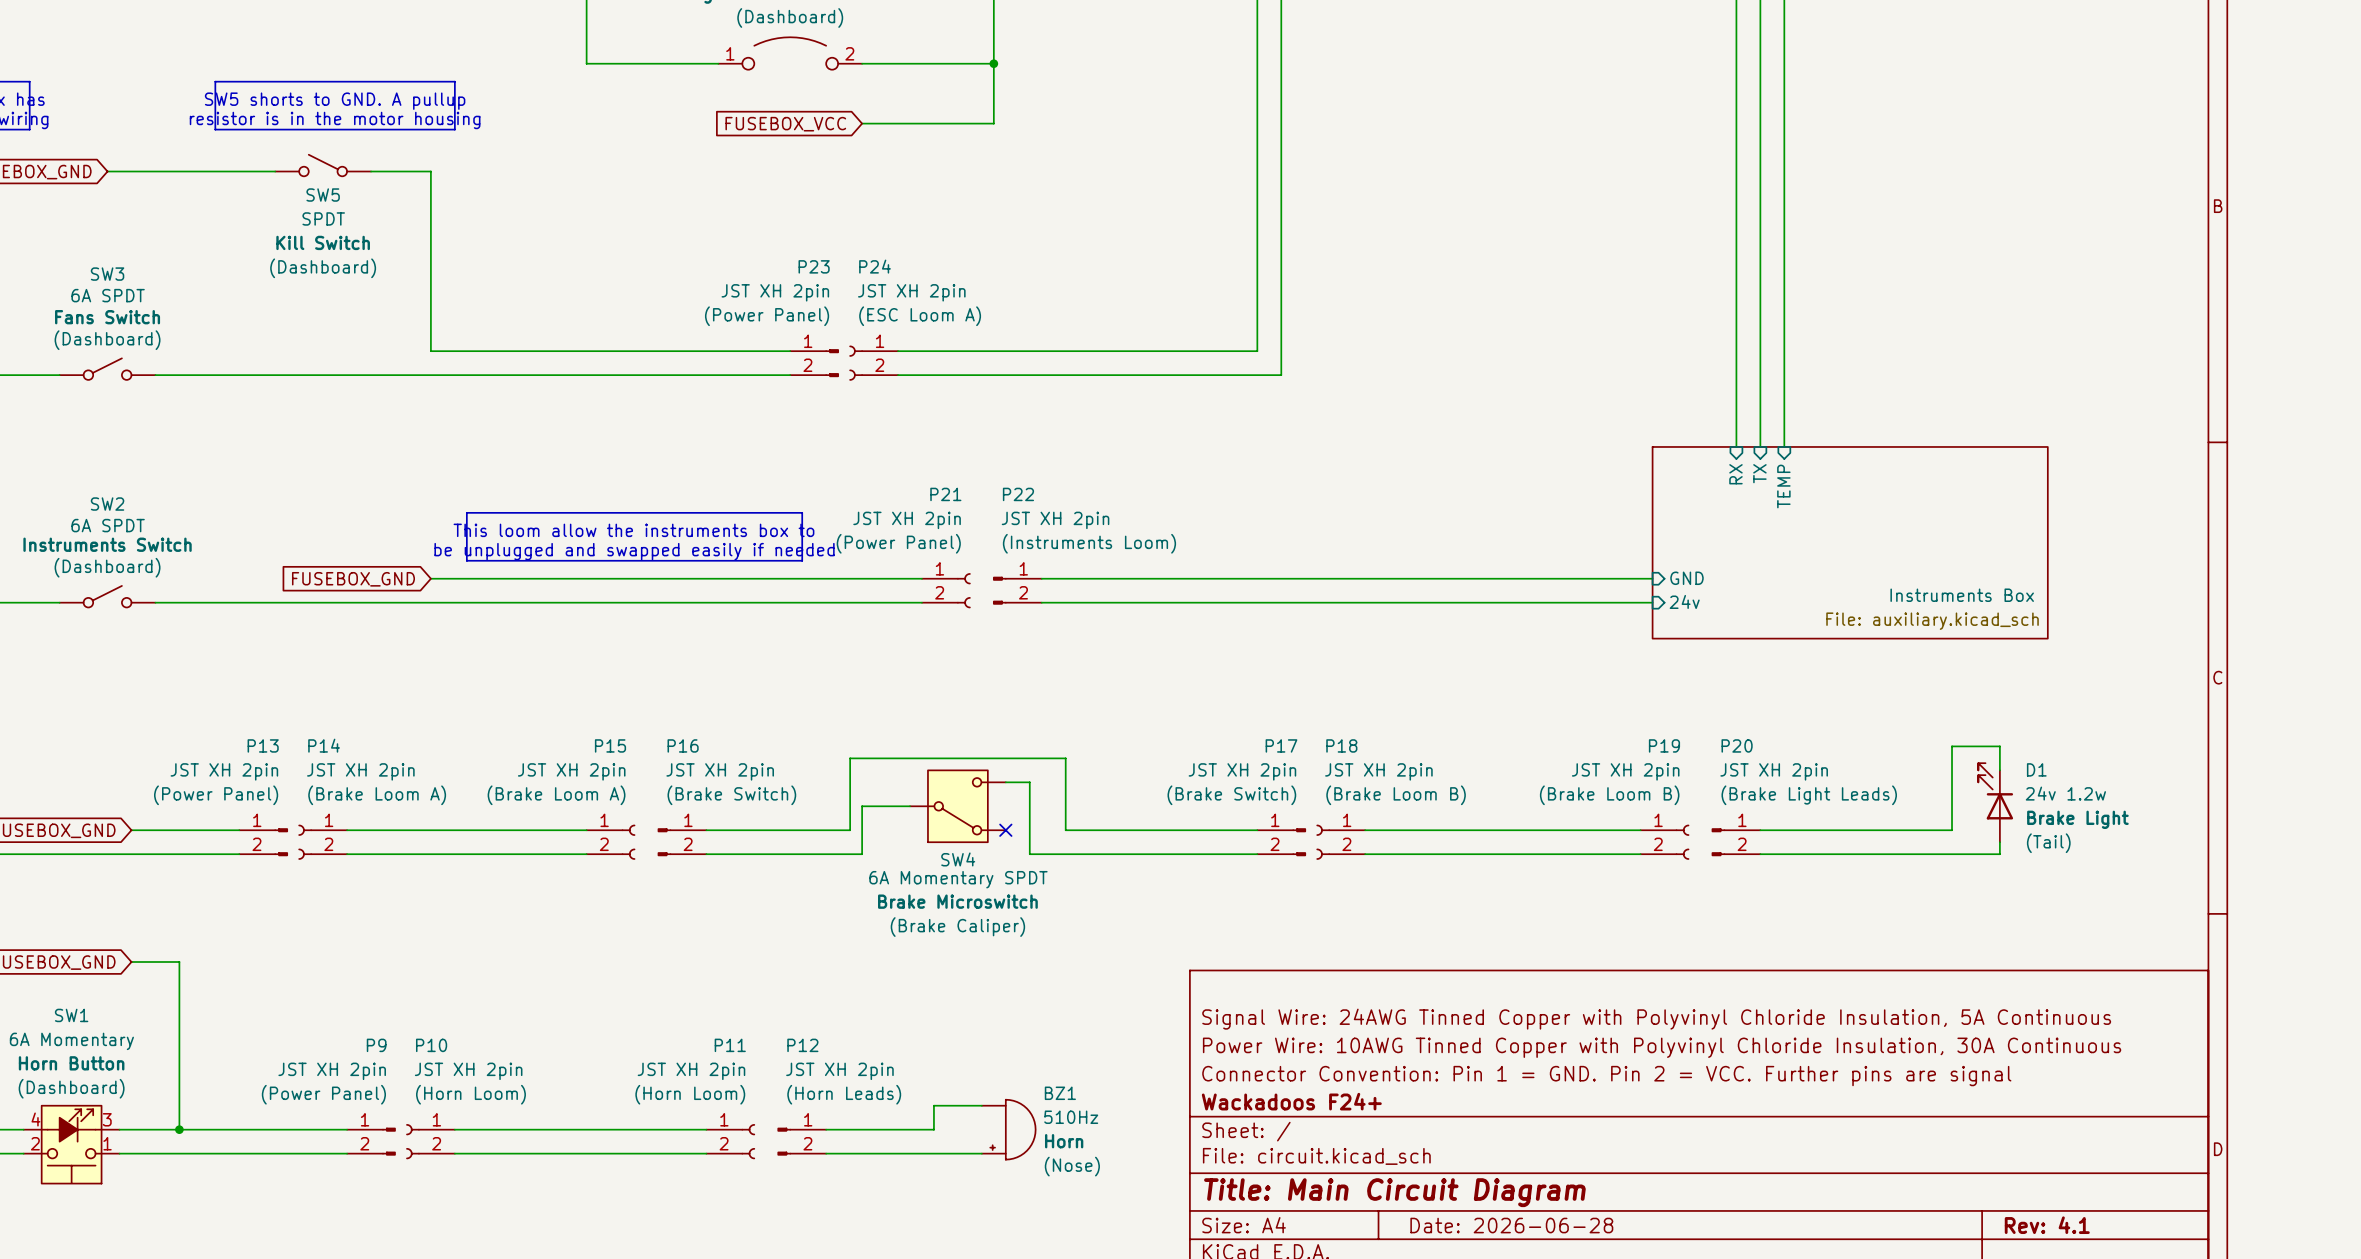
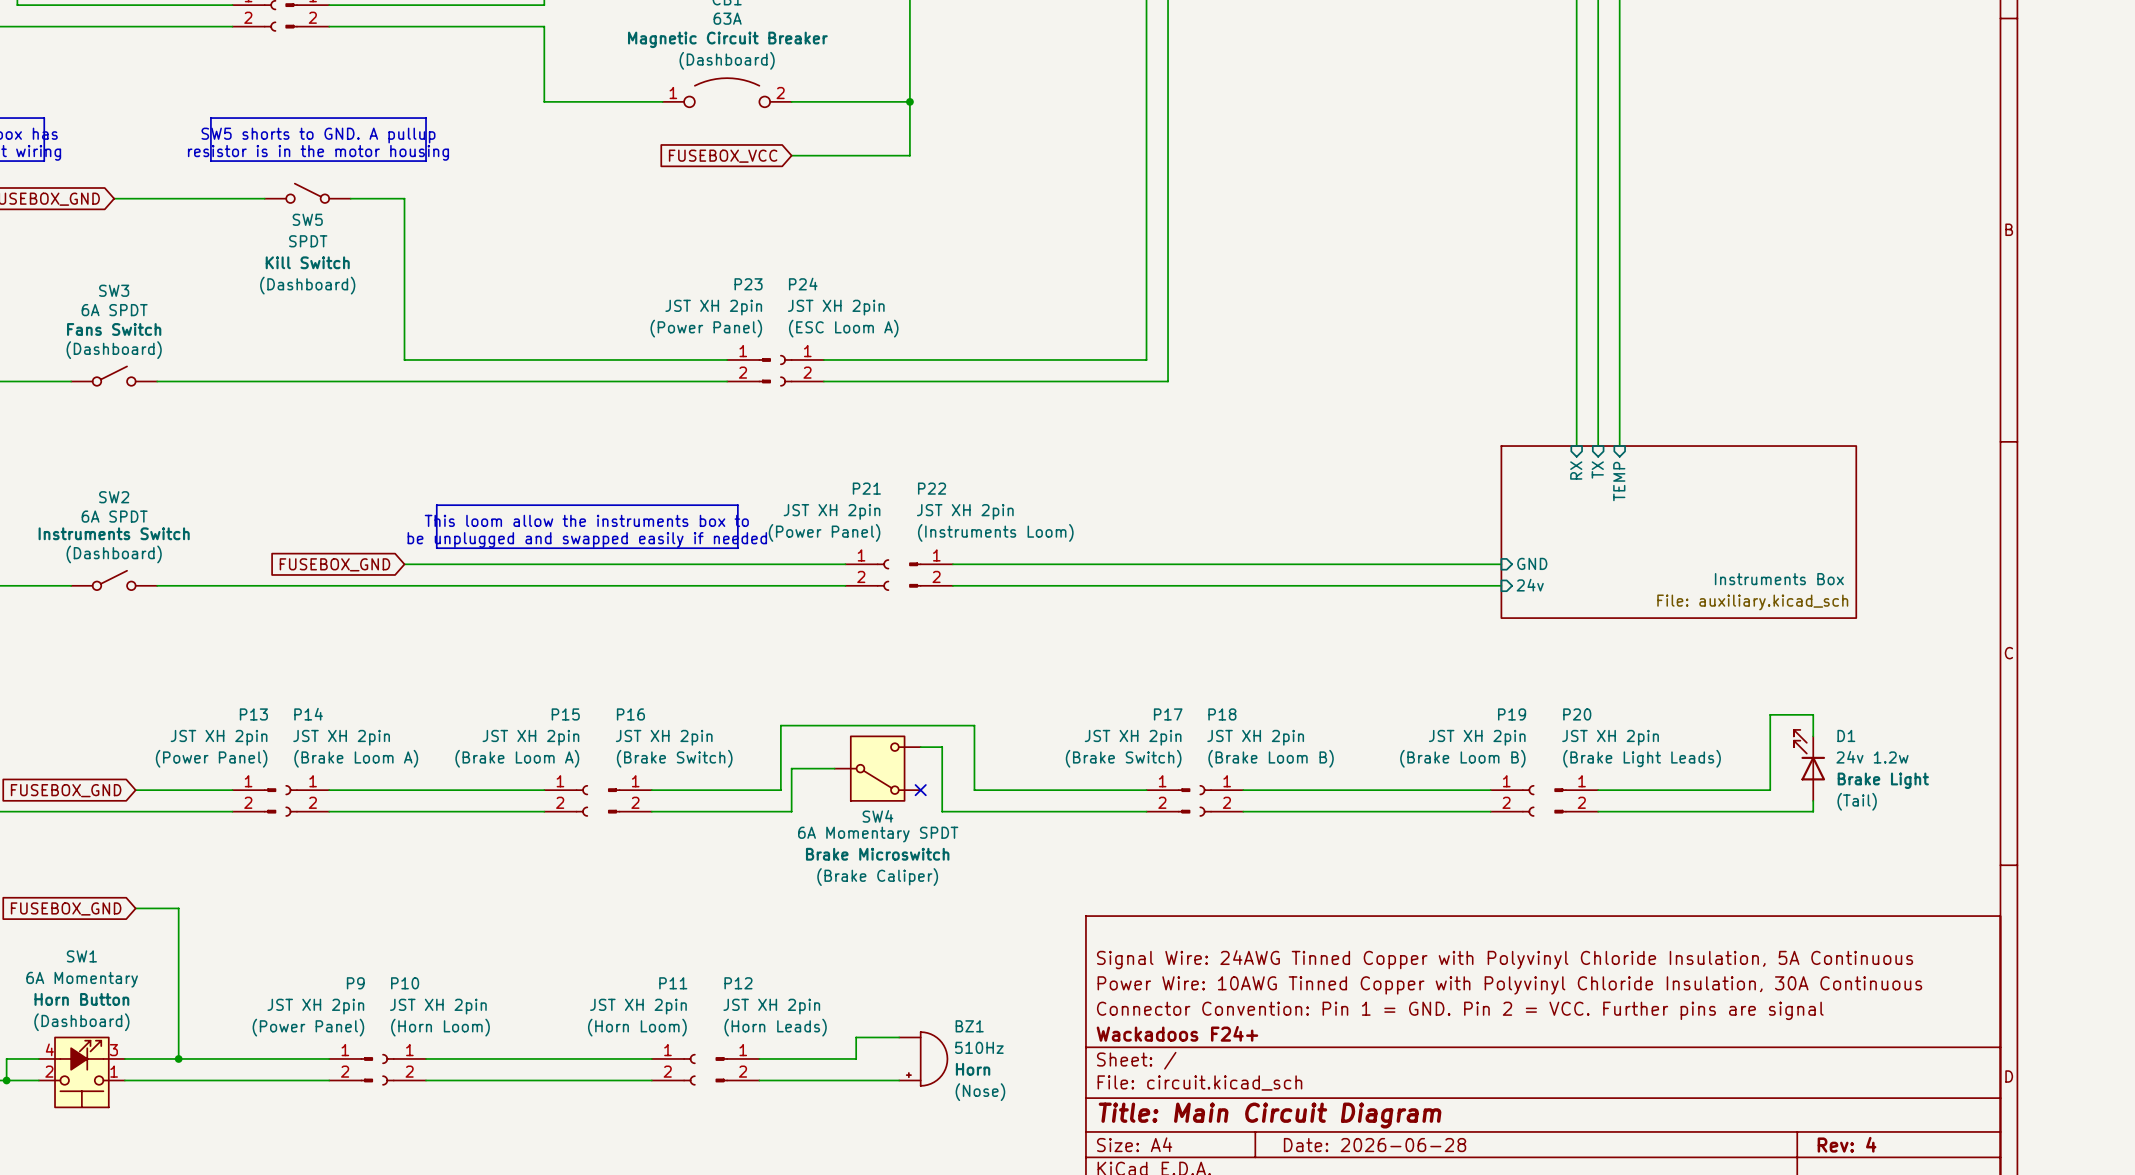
title block: Rev: 4.1 (2047, 1225) -> Rev: 4 (1847, 1144)

